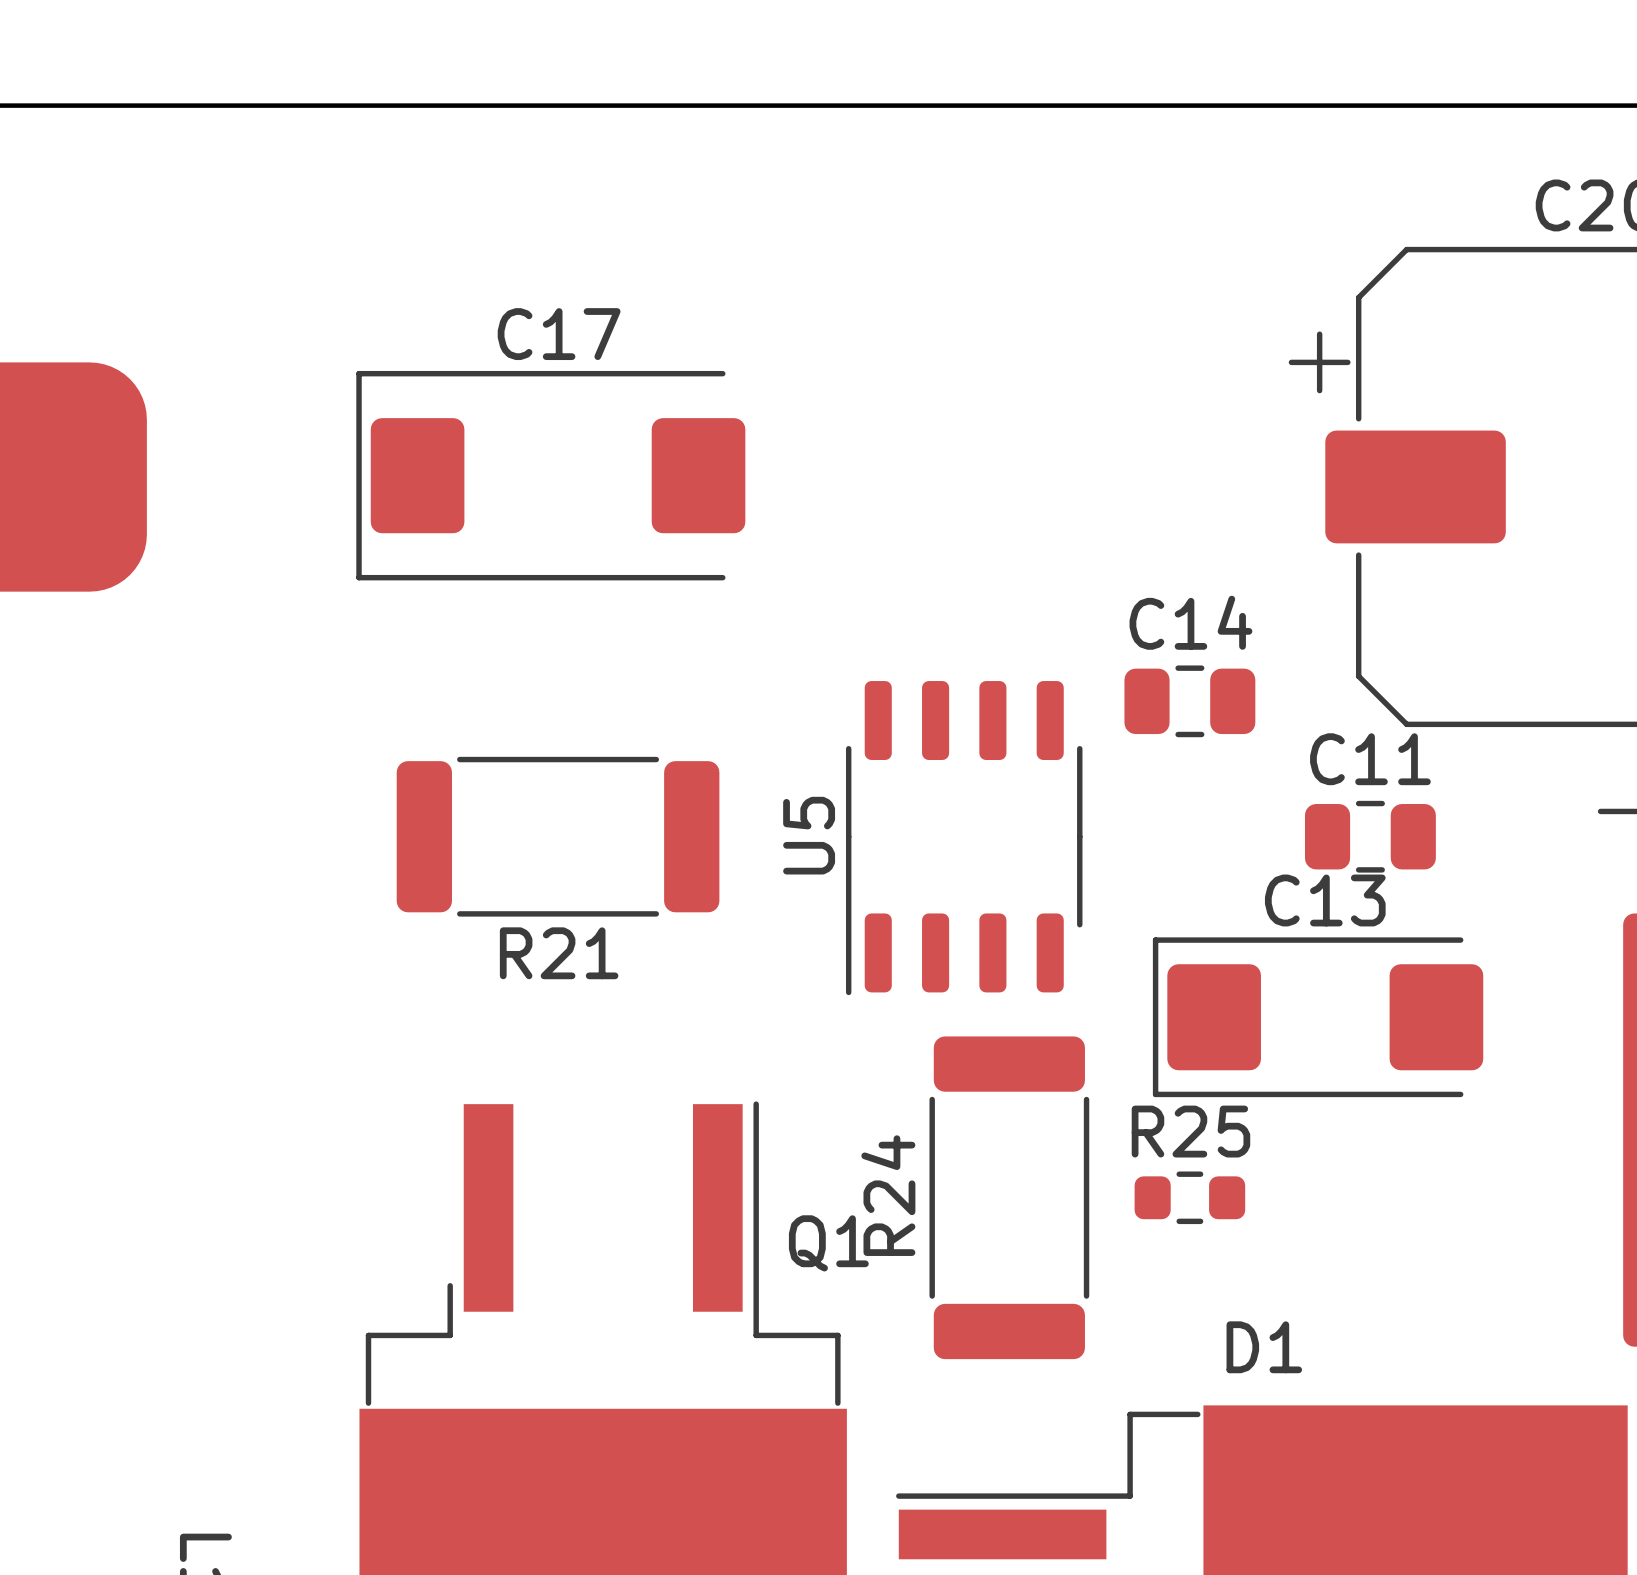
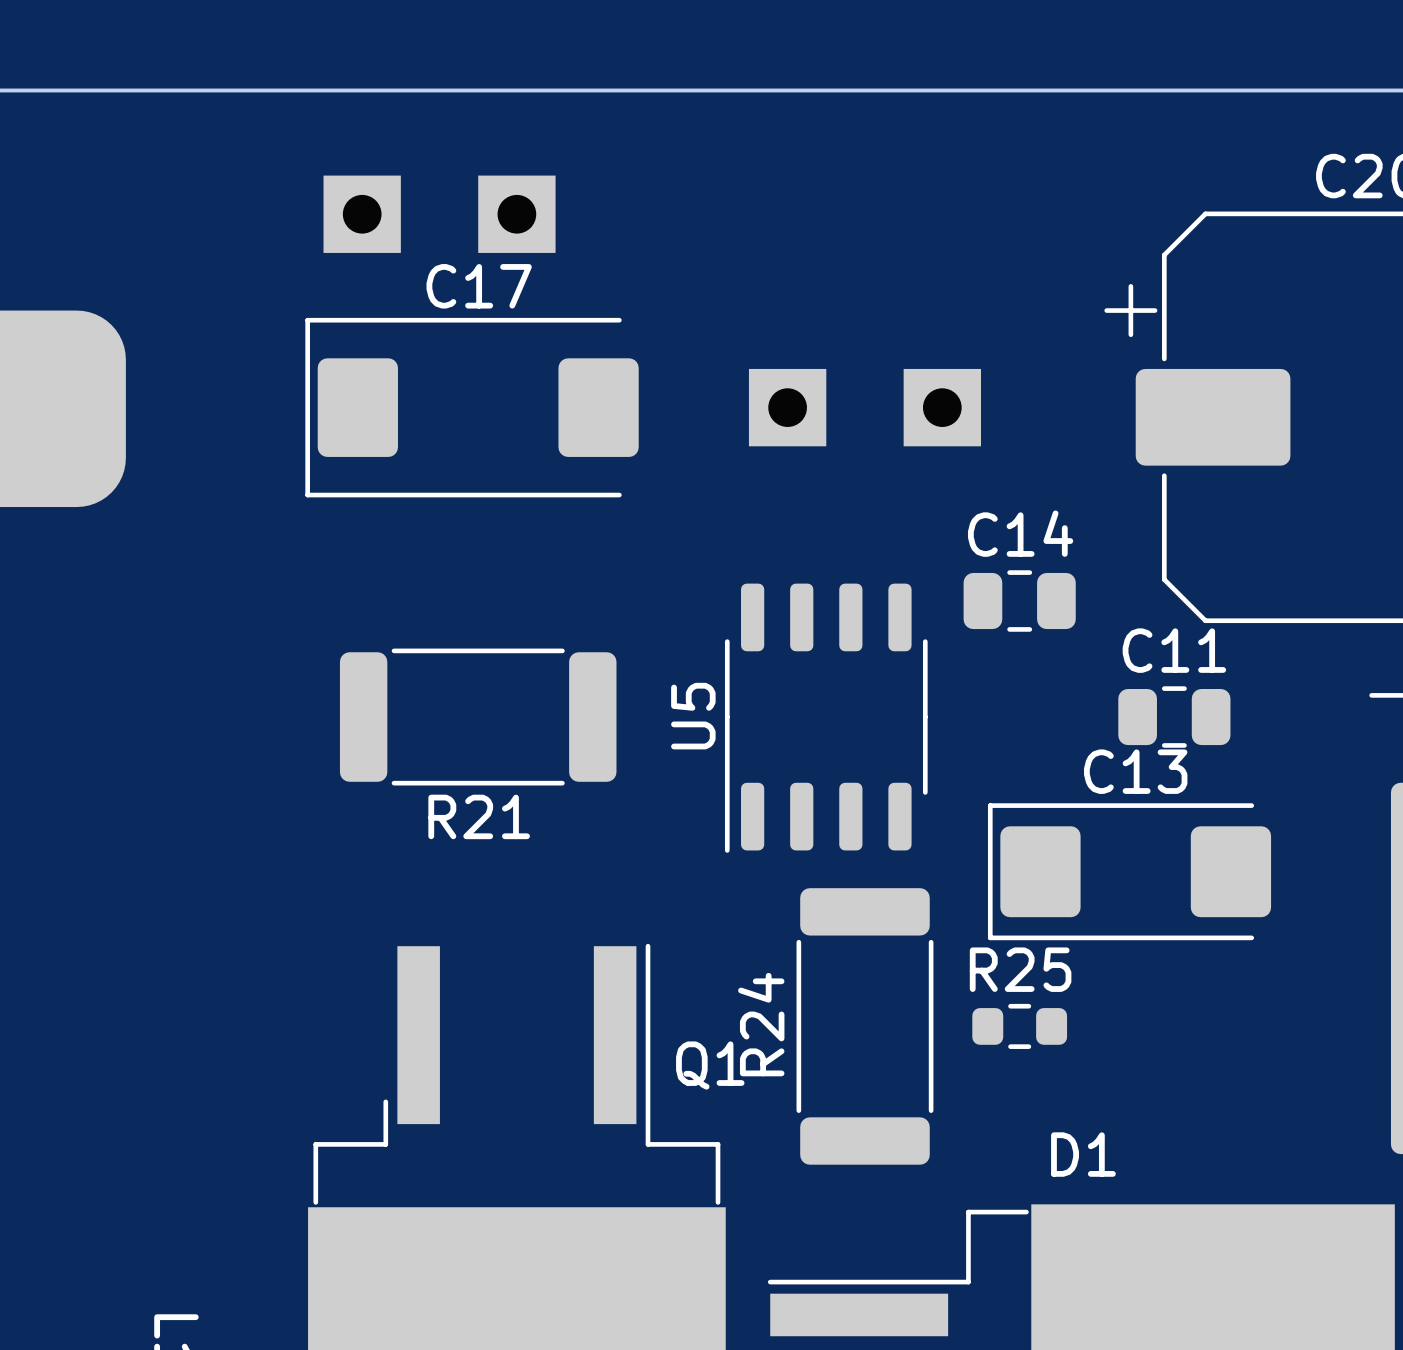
part: none -> (362, 214)
part: none -> (516, 214)
part: none -> (787, 407)
part: none -> (942, 407)

